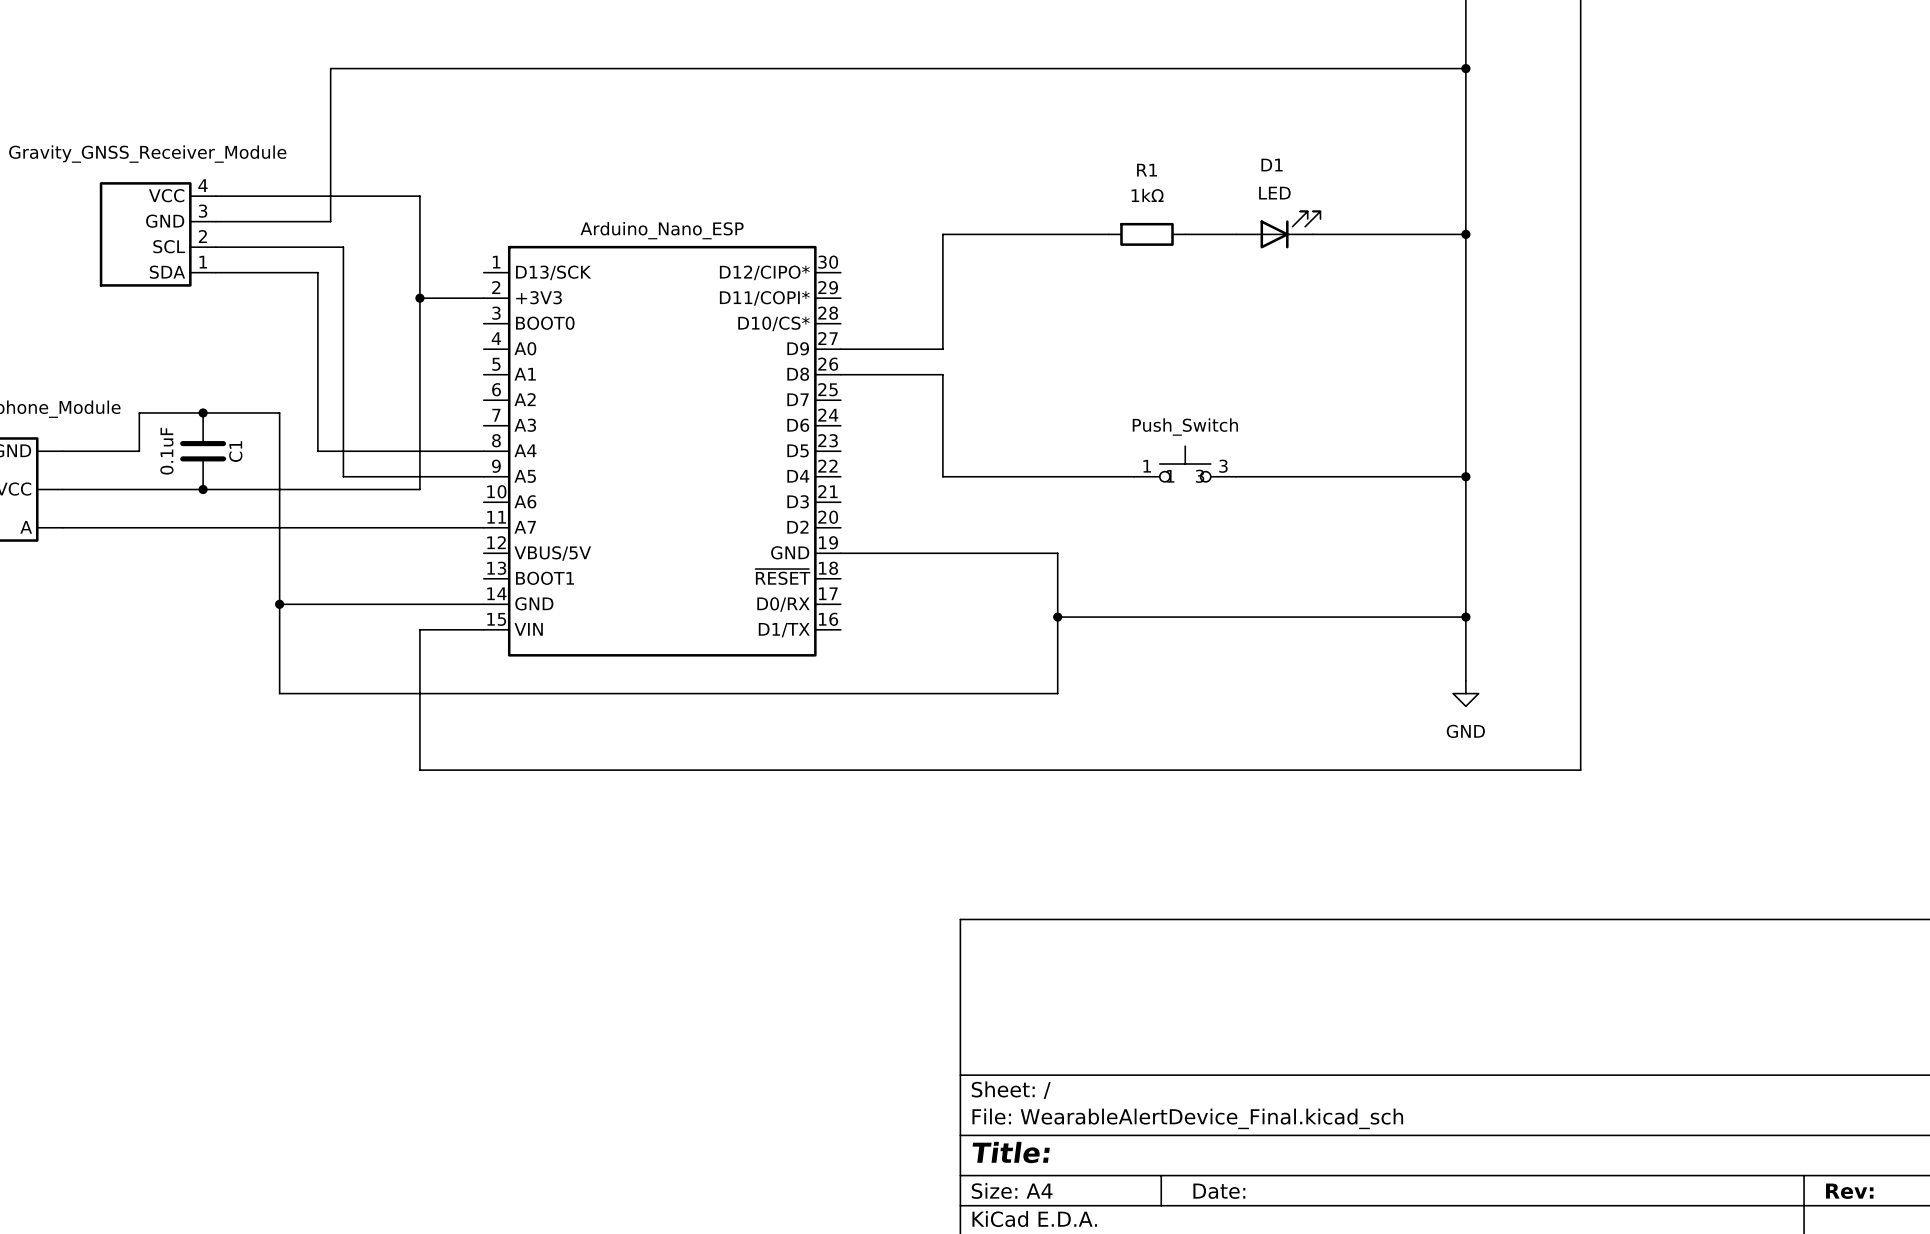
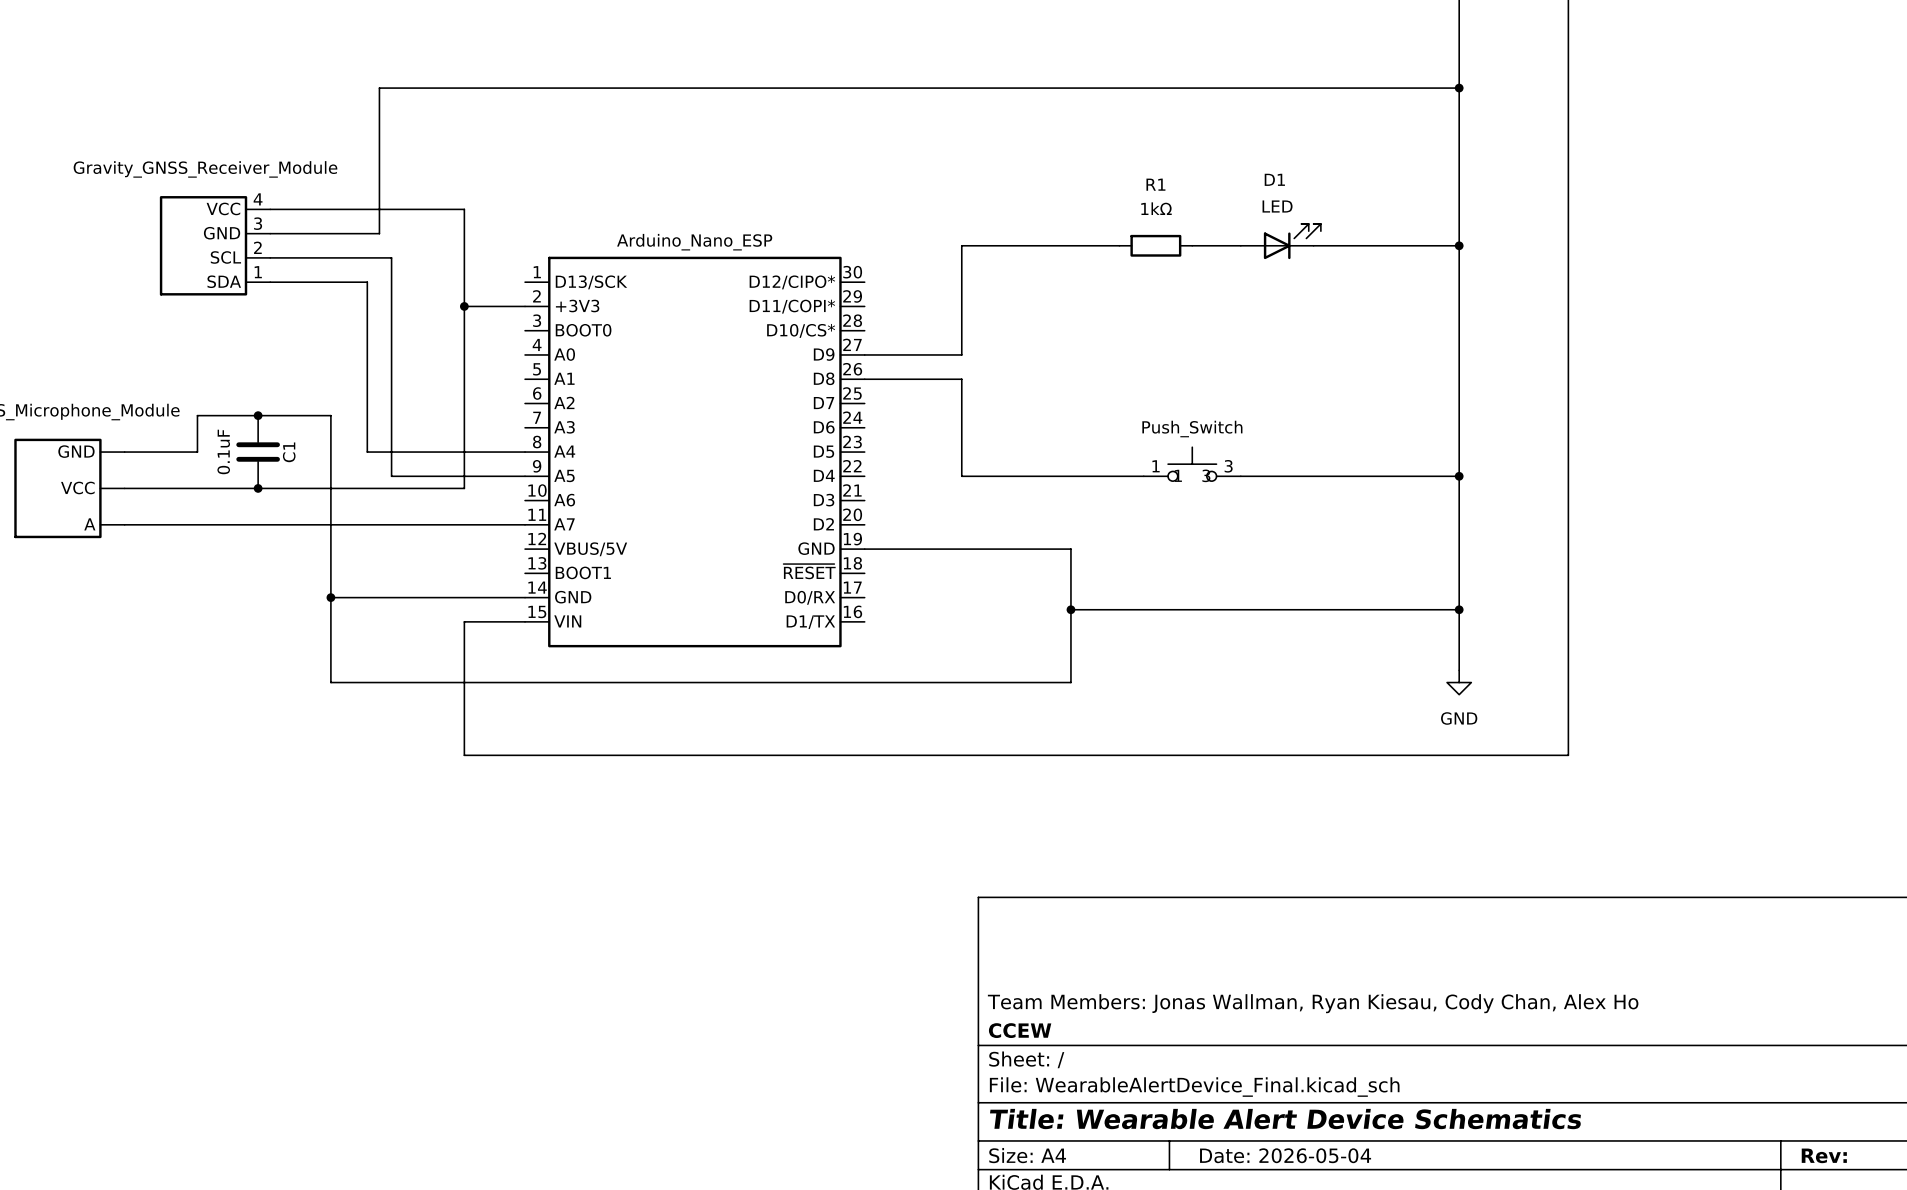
title block: none -> Team Members: Jonas Wallman, Ryan Kiesau, Cody Chan, Alex Ho (1313, 1003)
title block: none -> CCEW (1020, 1030)
title block: Title: (1011, 1152) -> Title: Wearable Alert Device Schematics (1285, 1119)
title block: Date: (1219, 1191) -> Date: 2026-05-04 (1285, 1155)

